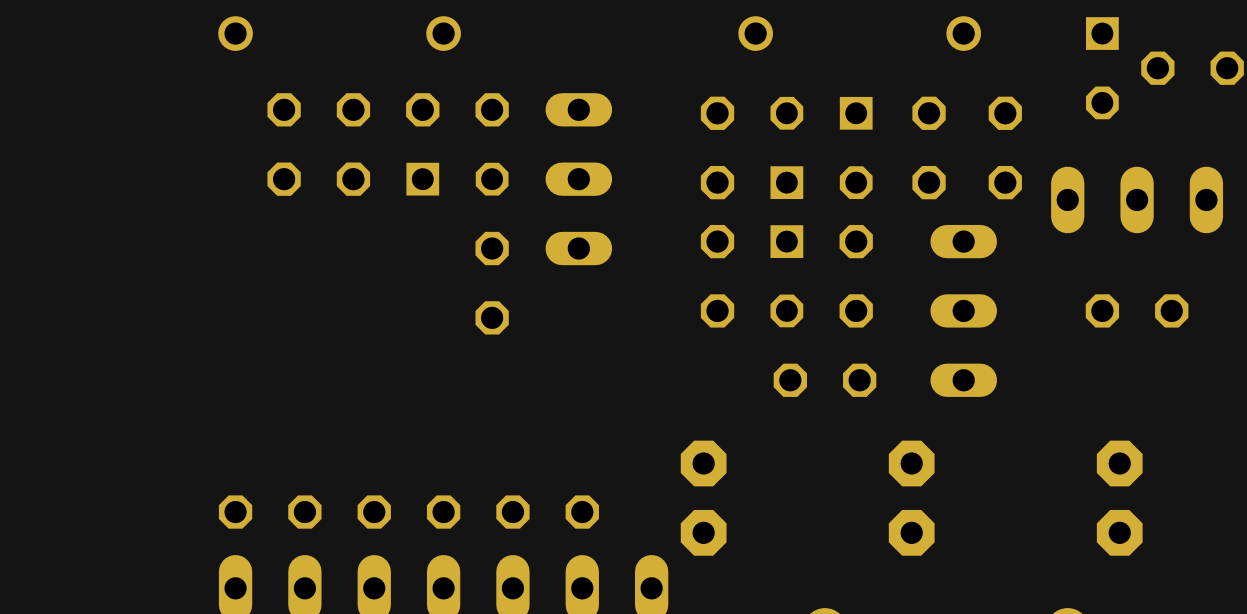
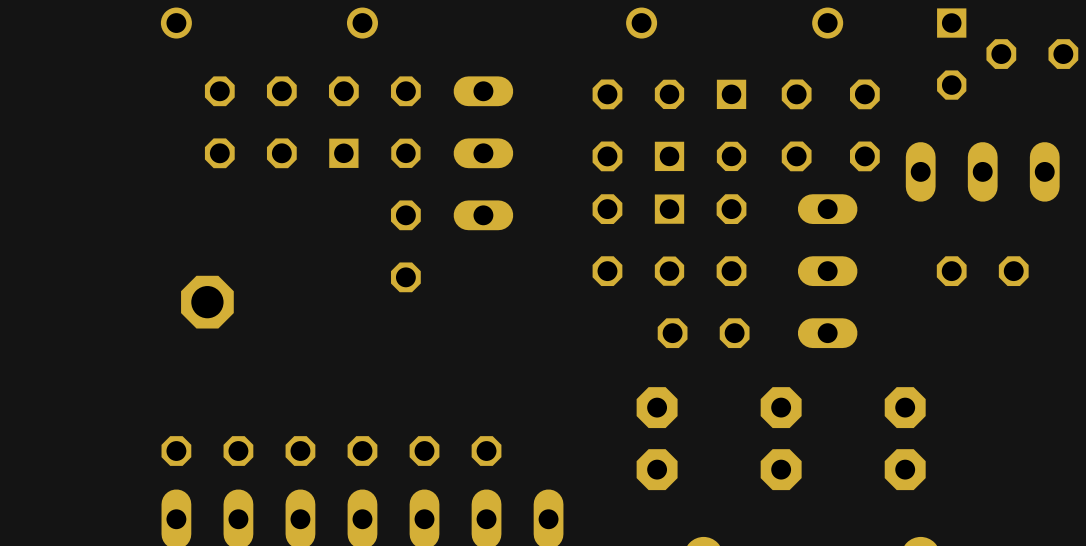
part: none -> (207, 302)
part position: (703, 498) -> (657, 438)
part position: (1119, 498) -> (905, 438)

